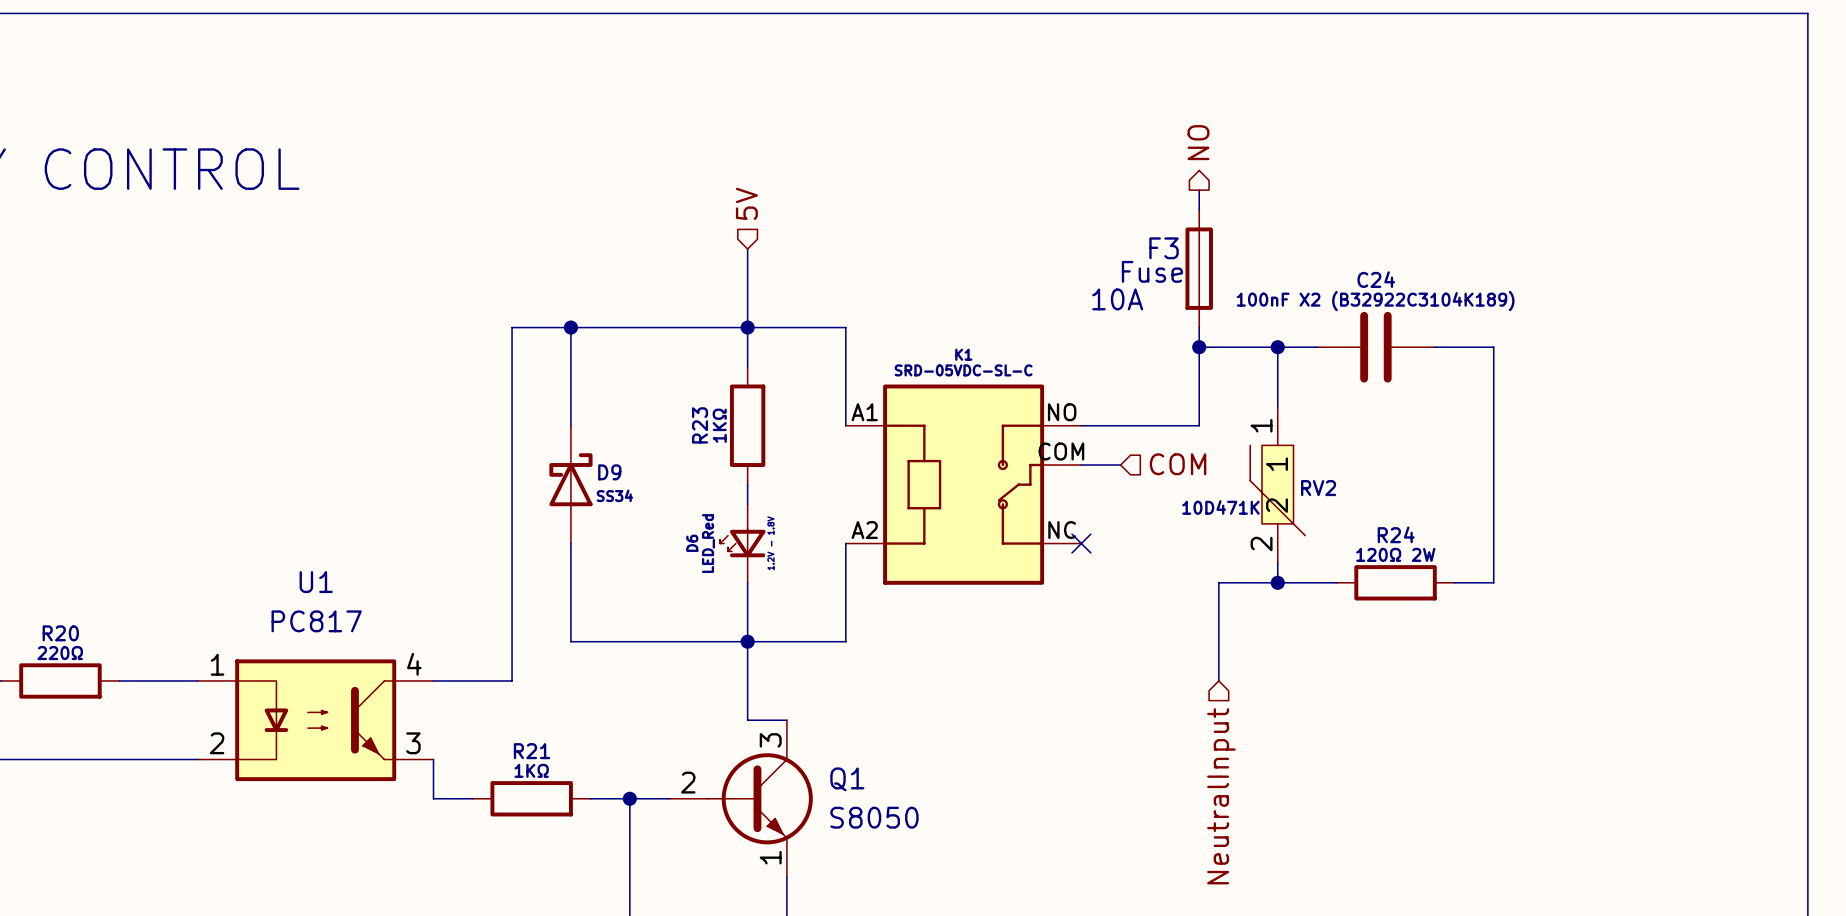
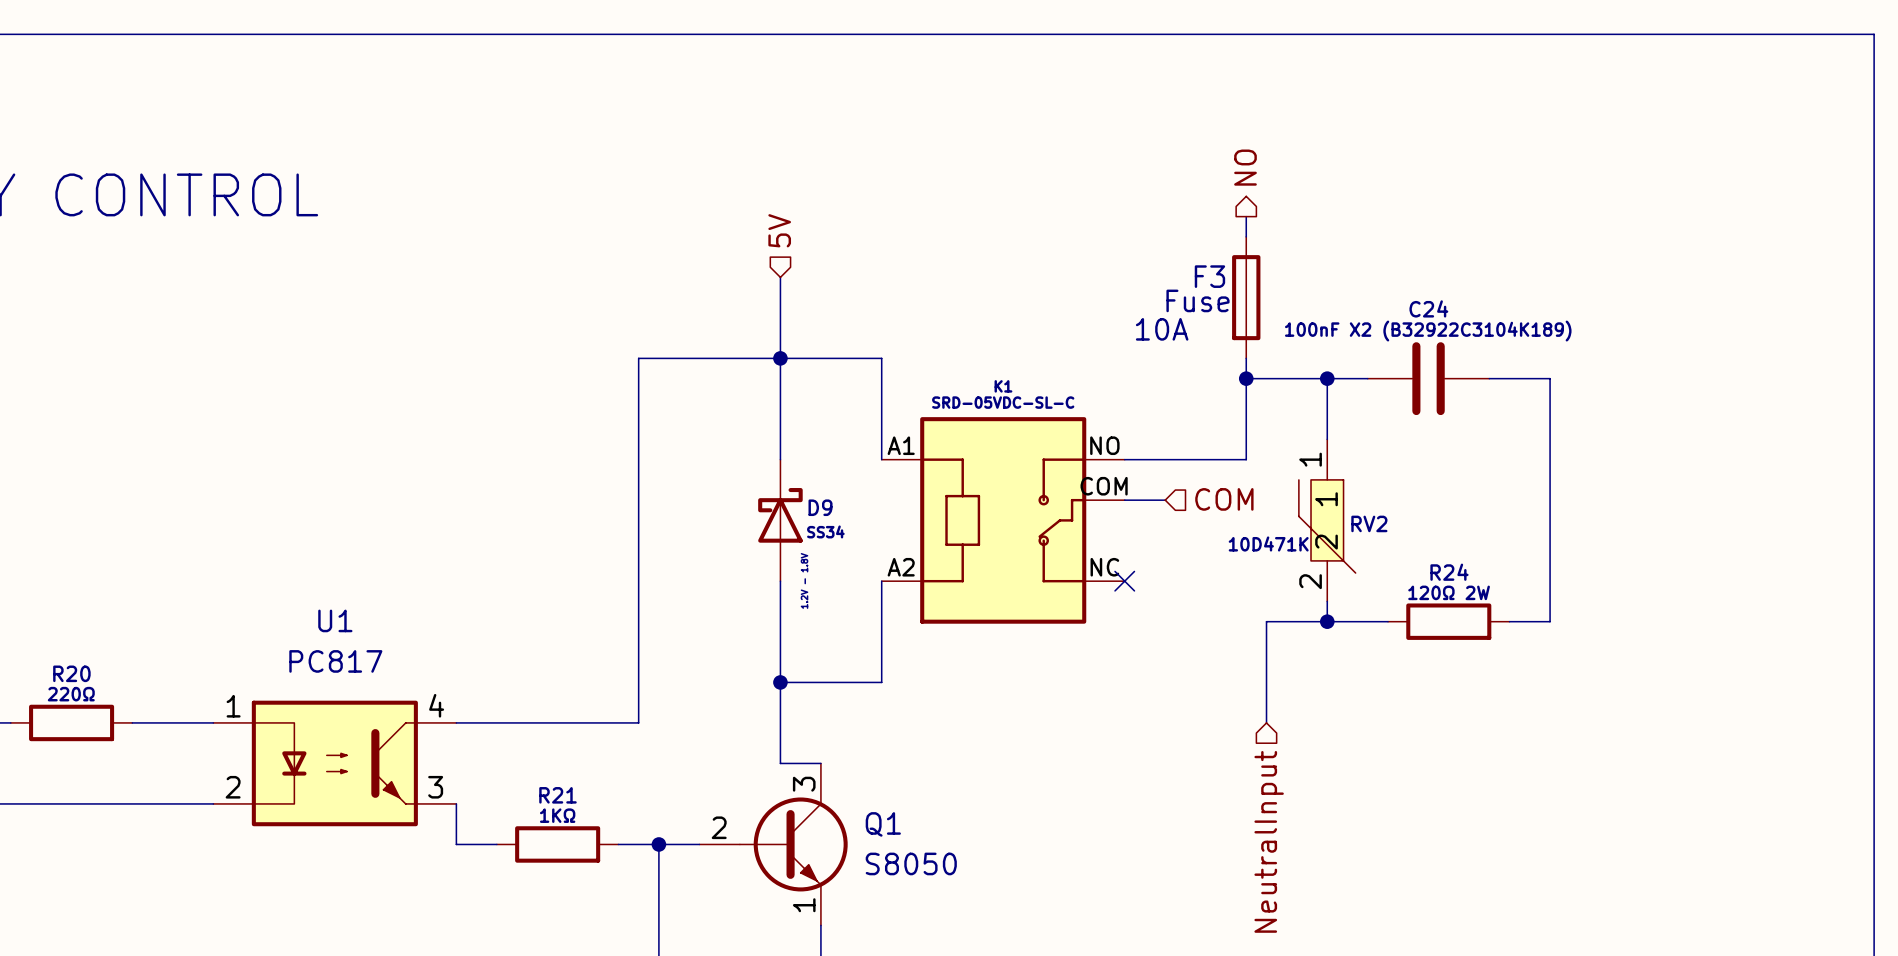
wire: (570, 327) (570, 425) -> none
junction: (570, 327) -> none
wire: (610, 327) (512, 327) (512, 680) -> (638, 358) (638, 722) (537, 722)
wire: none -> (780, 398) (780, 459)
R23: 1KΩ (747, 425) -> none
D9 position: (570, 484) -> (780, 520)
wire: (570, 543) (570, 641) (747, 641) -> none
D6: LED_Red (742, 543) -> none

